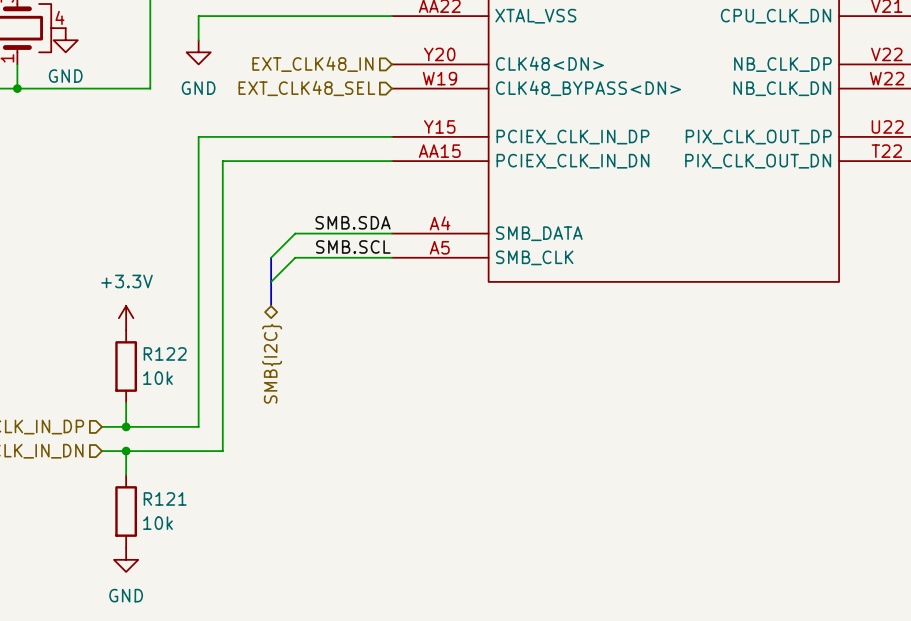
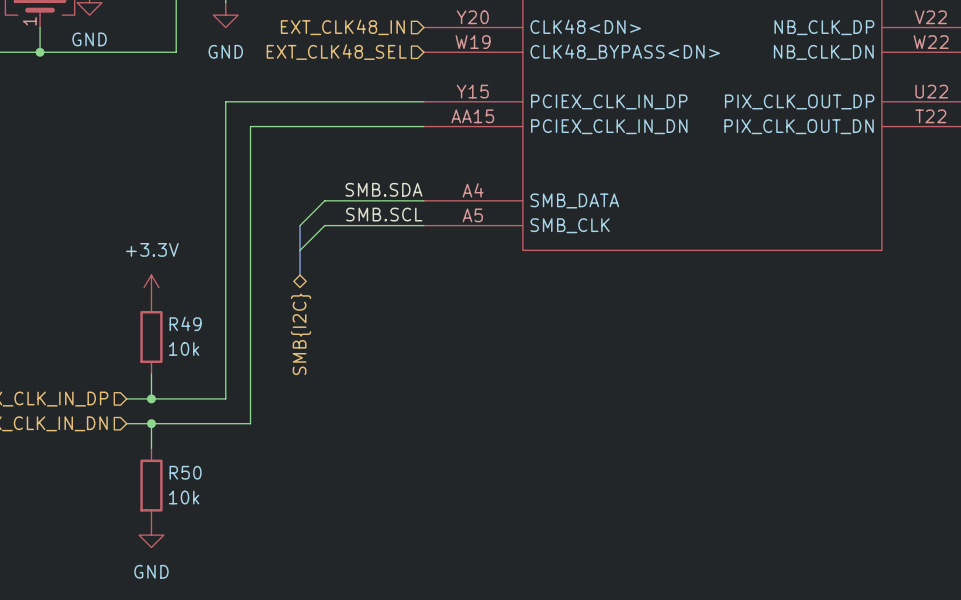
R122 name: R122 (165, 353) -> R49 (185, 323)
R121 name: R121 (165, 498) -> R50 (185, 472)

